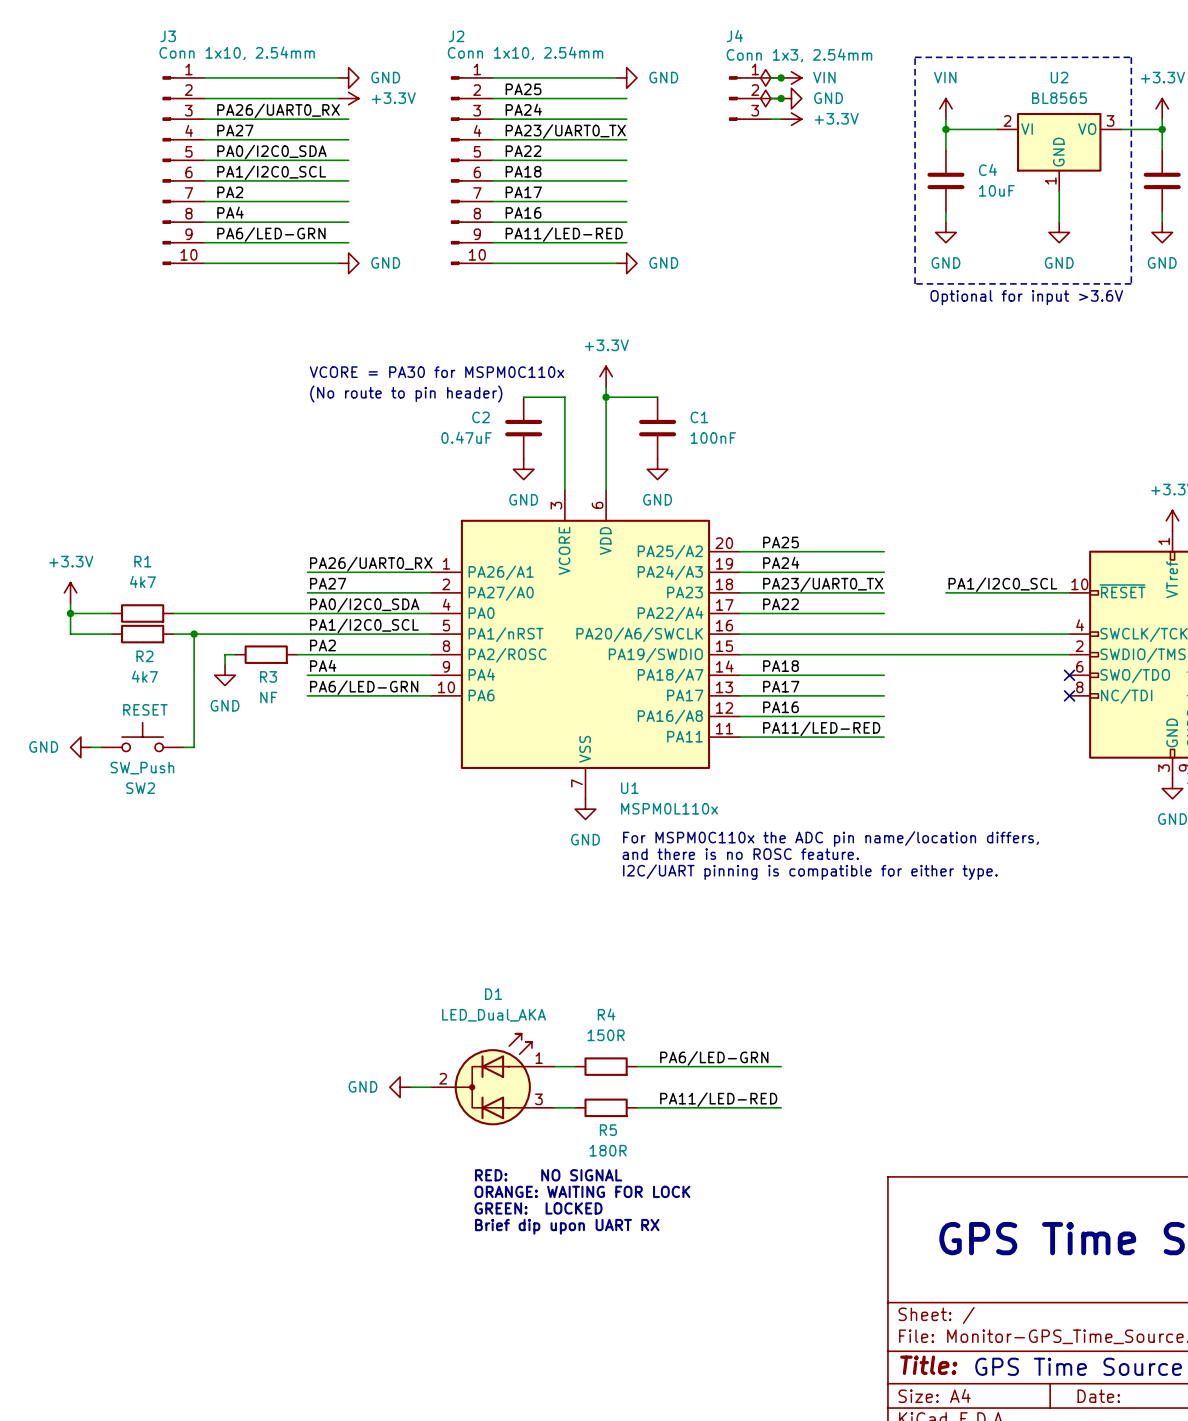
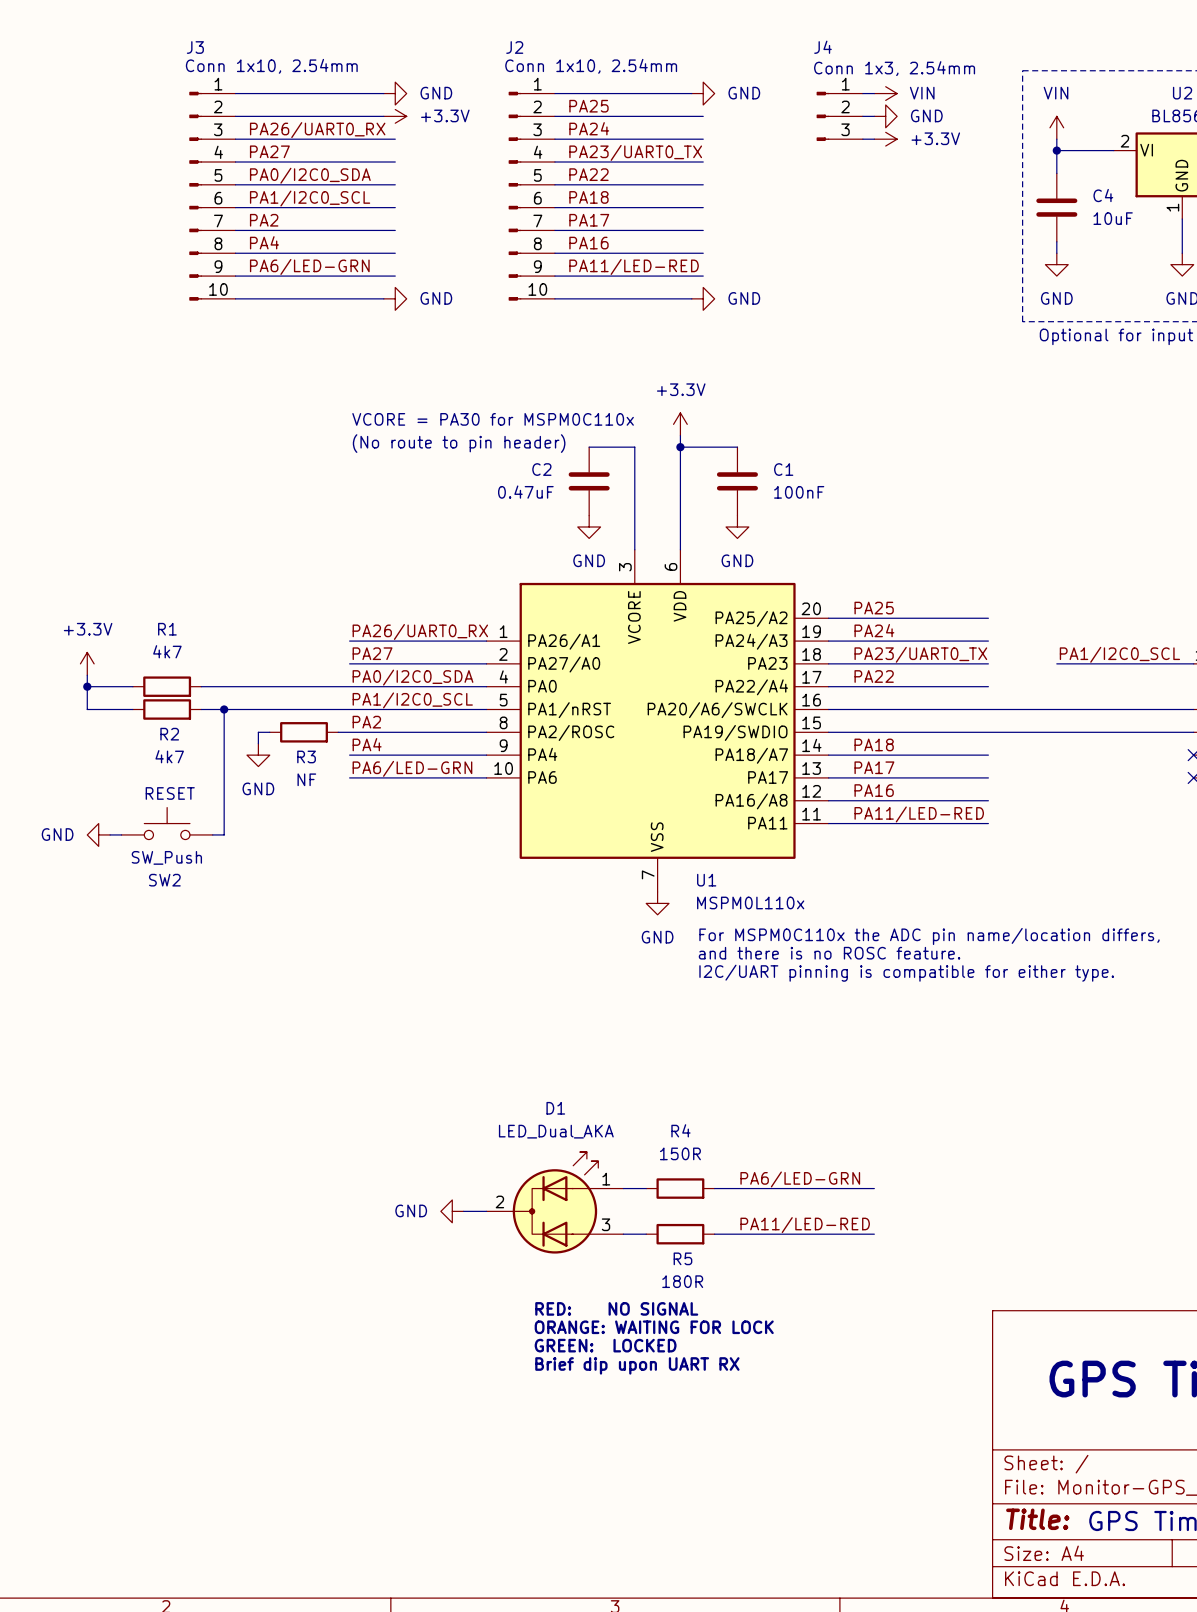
power symbol: (770, 77) -> none
junction: (781, 77) -> none
power symbol: (770, 98) -> none
junction: (781, 98) -> none

